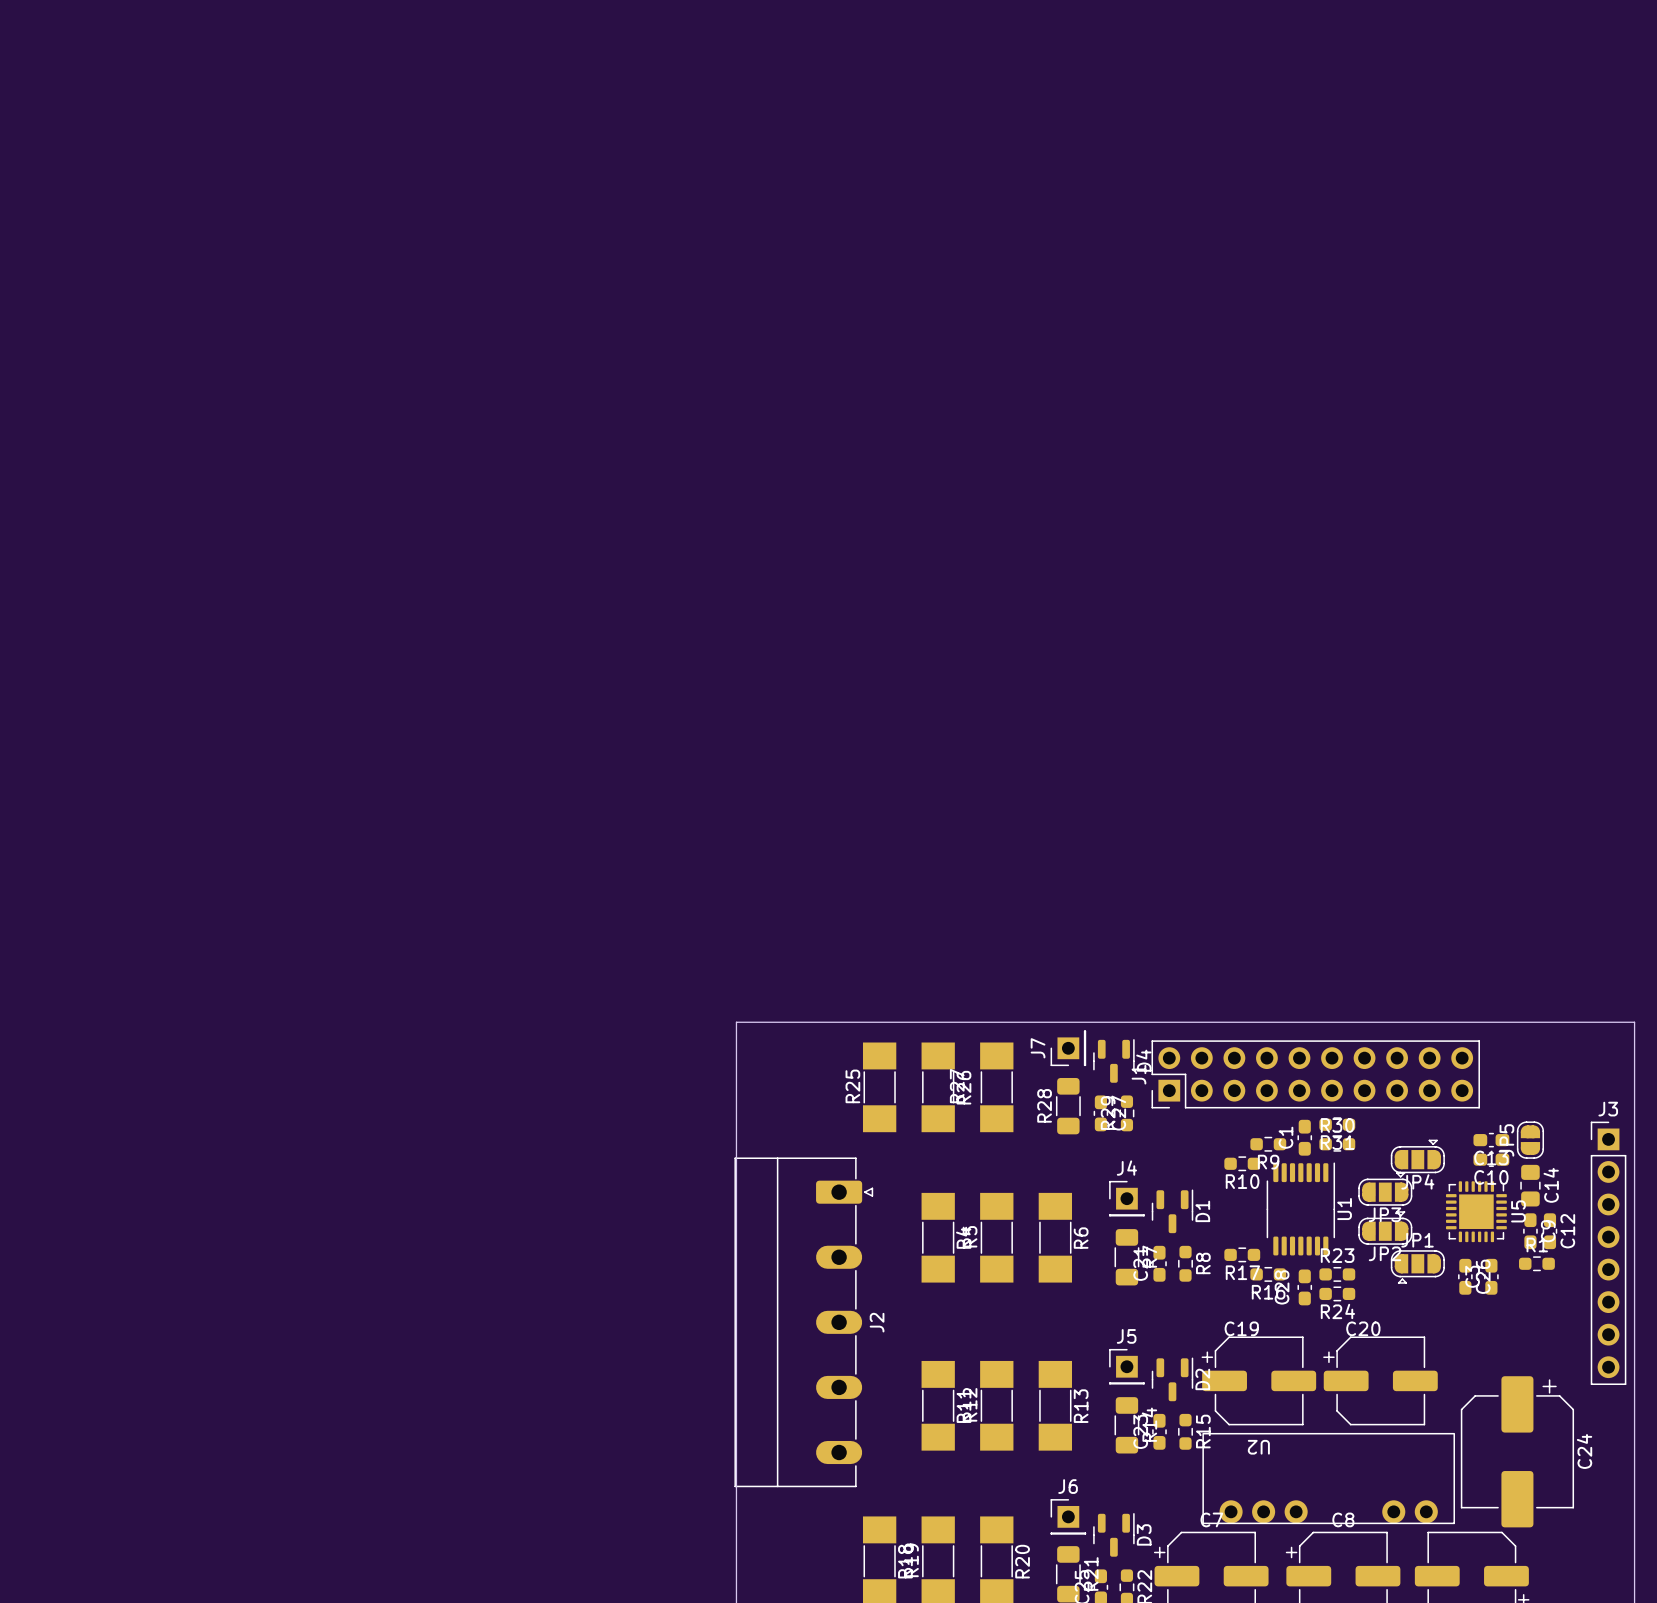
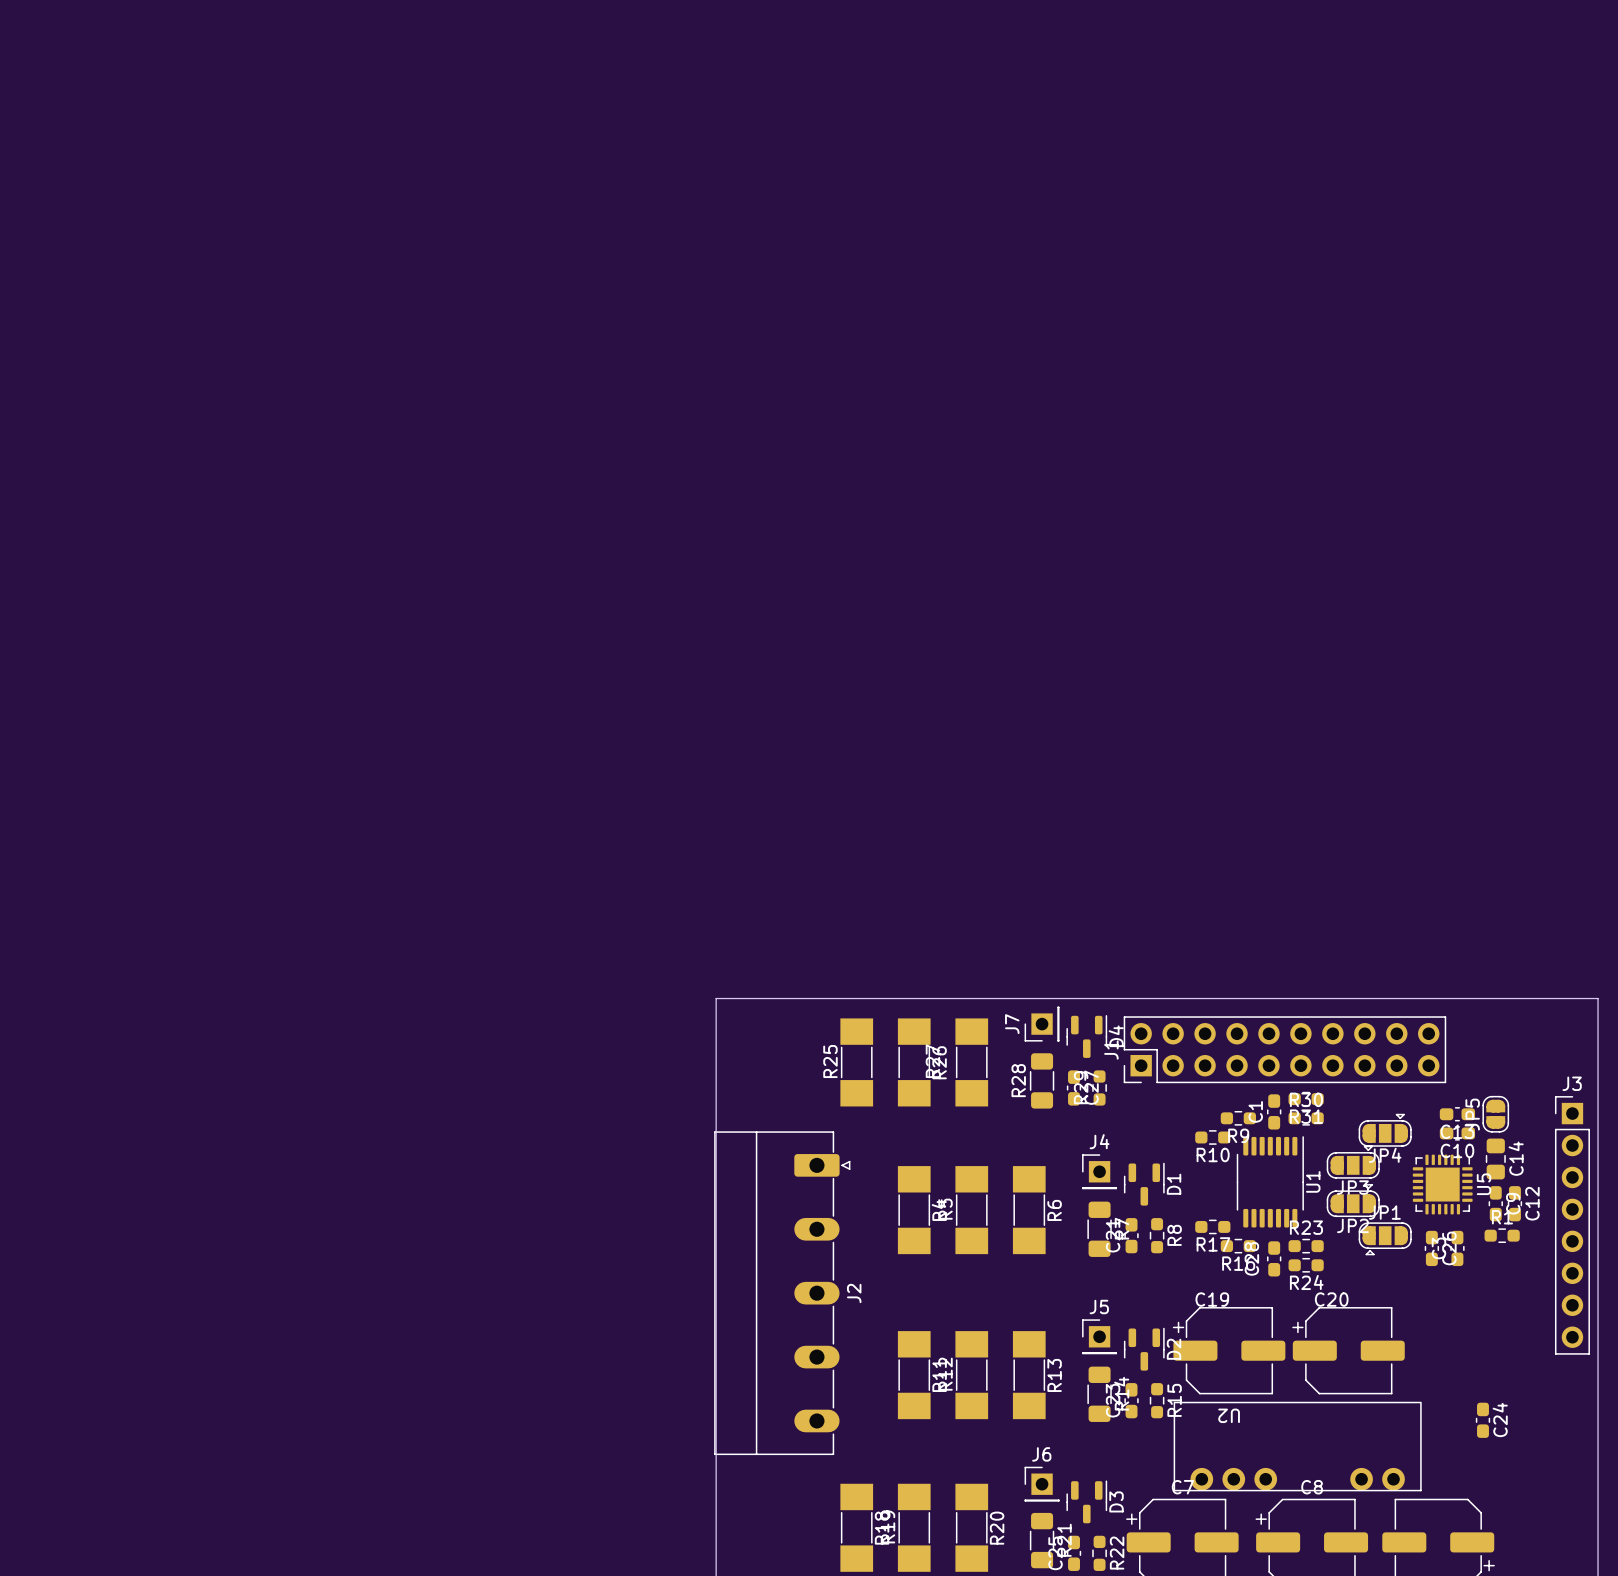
C24 footprint: [1460, 1376, 1575, 1528] -> [1475, 1402, 1491, 1438]
C24 name position: C24 (1584, 1451) -> C24 (1500, 1419)

